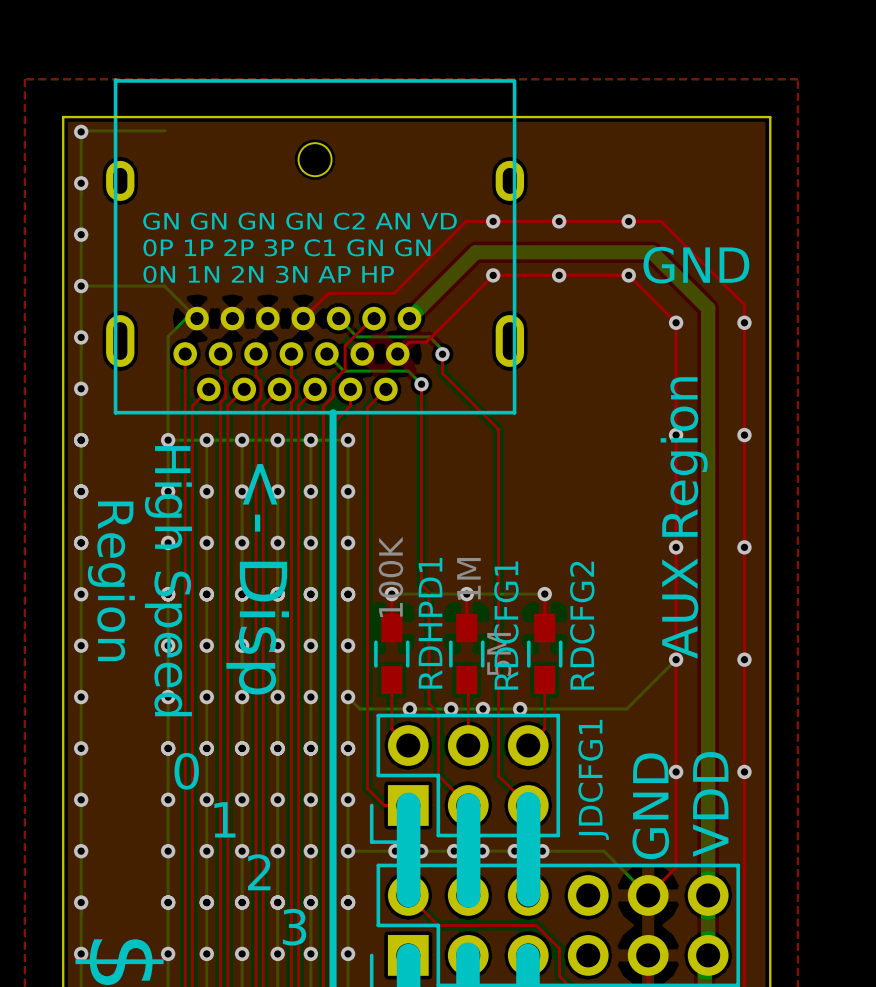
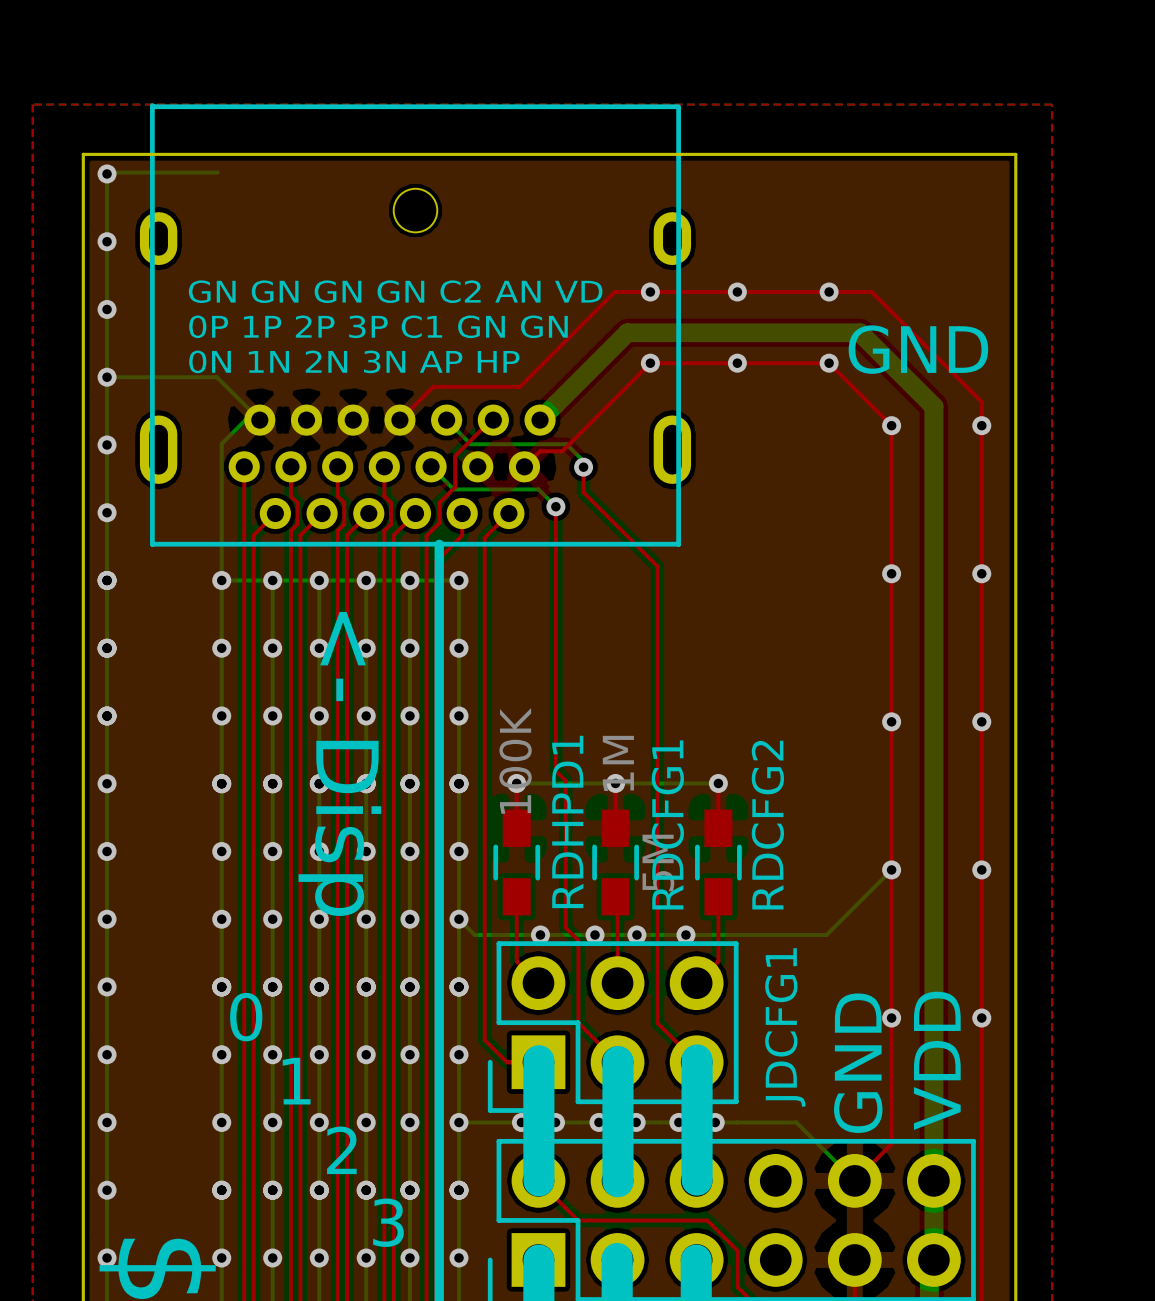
text: AUX Region (684, 517) -> none
text: Region (111, 581) -> none
text: High Speed (168, 581) -> none
text: JDCFG1 (593, 779) -> none
JDCFG1 name: none -> JDCFG1 (785, 1027)

